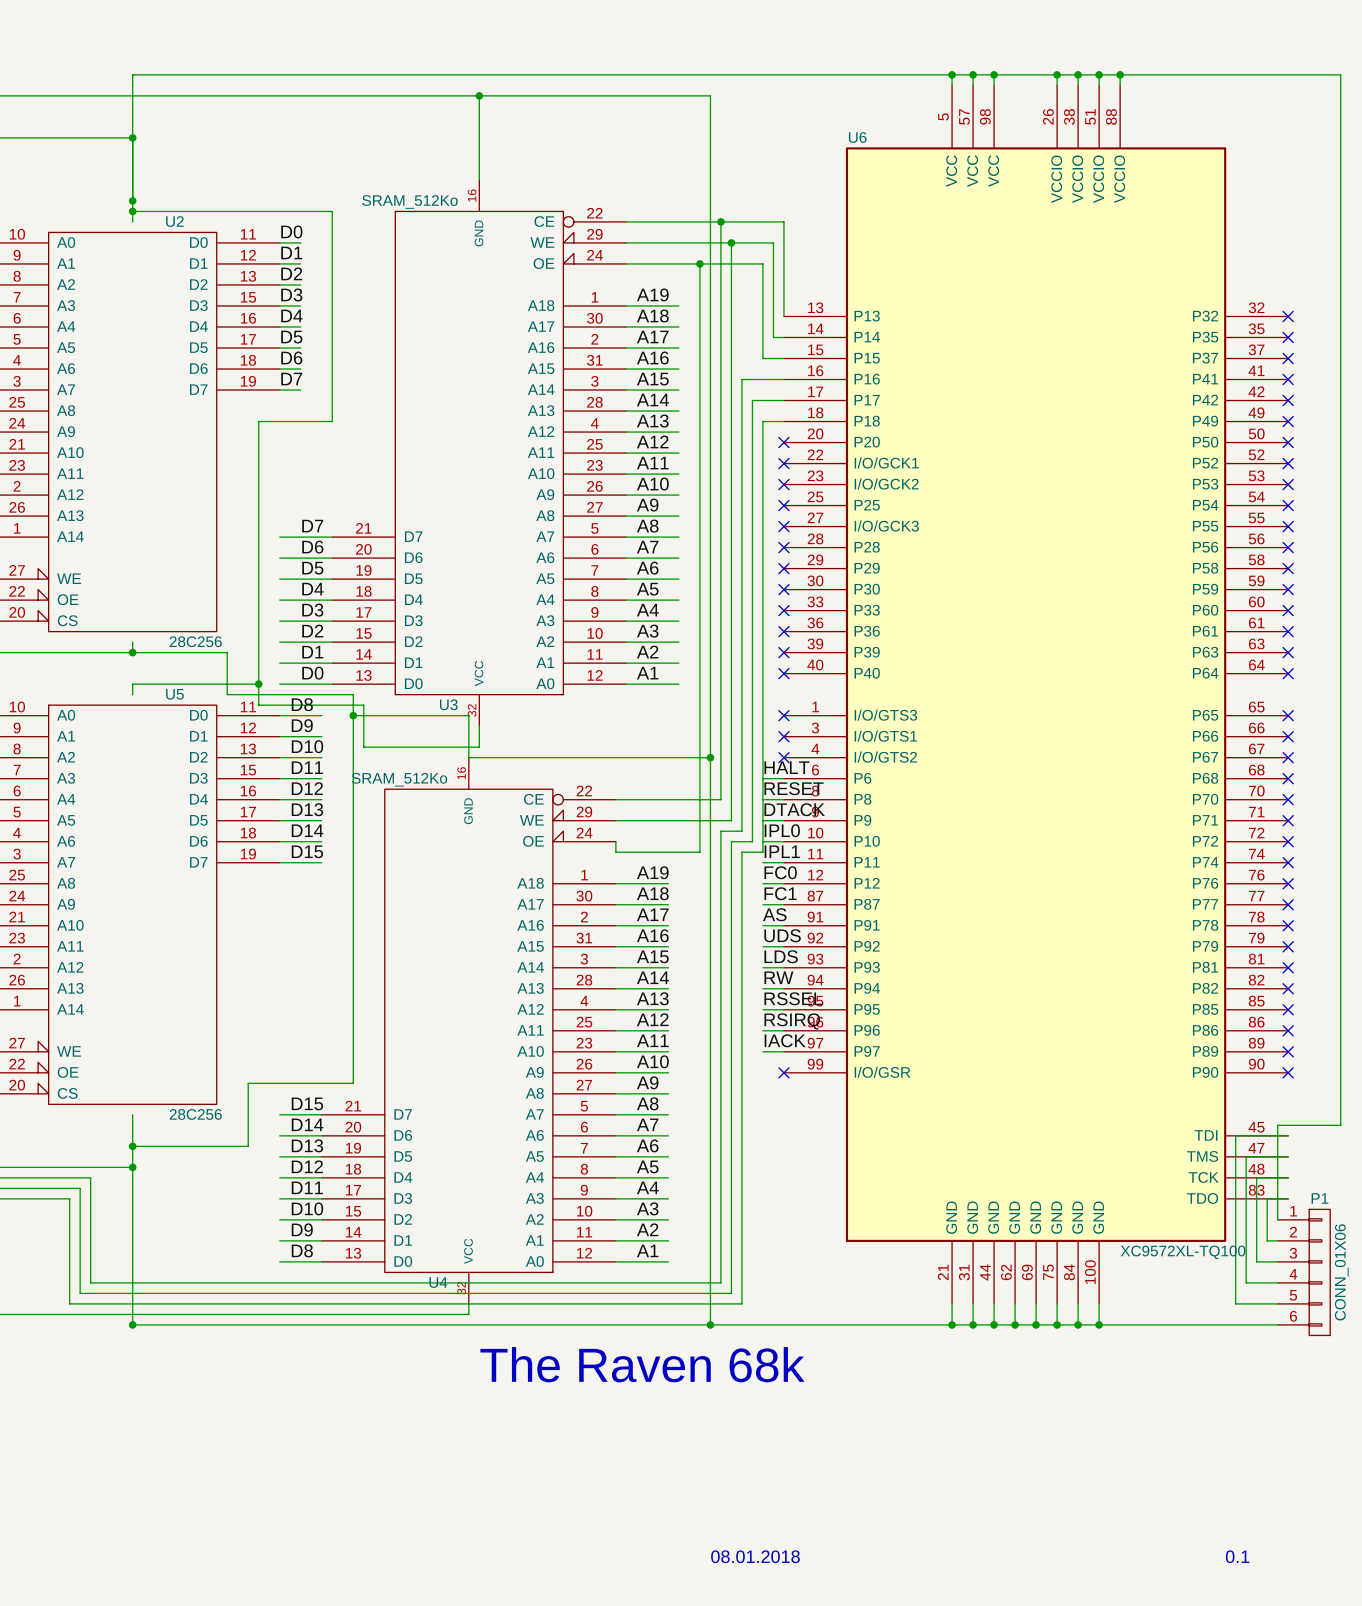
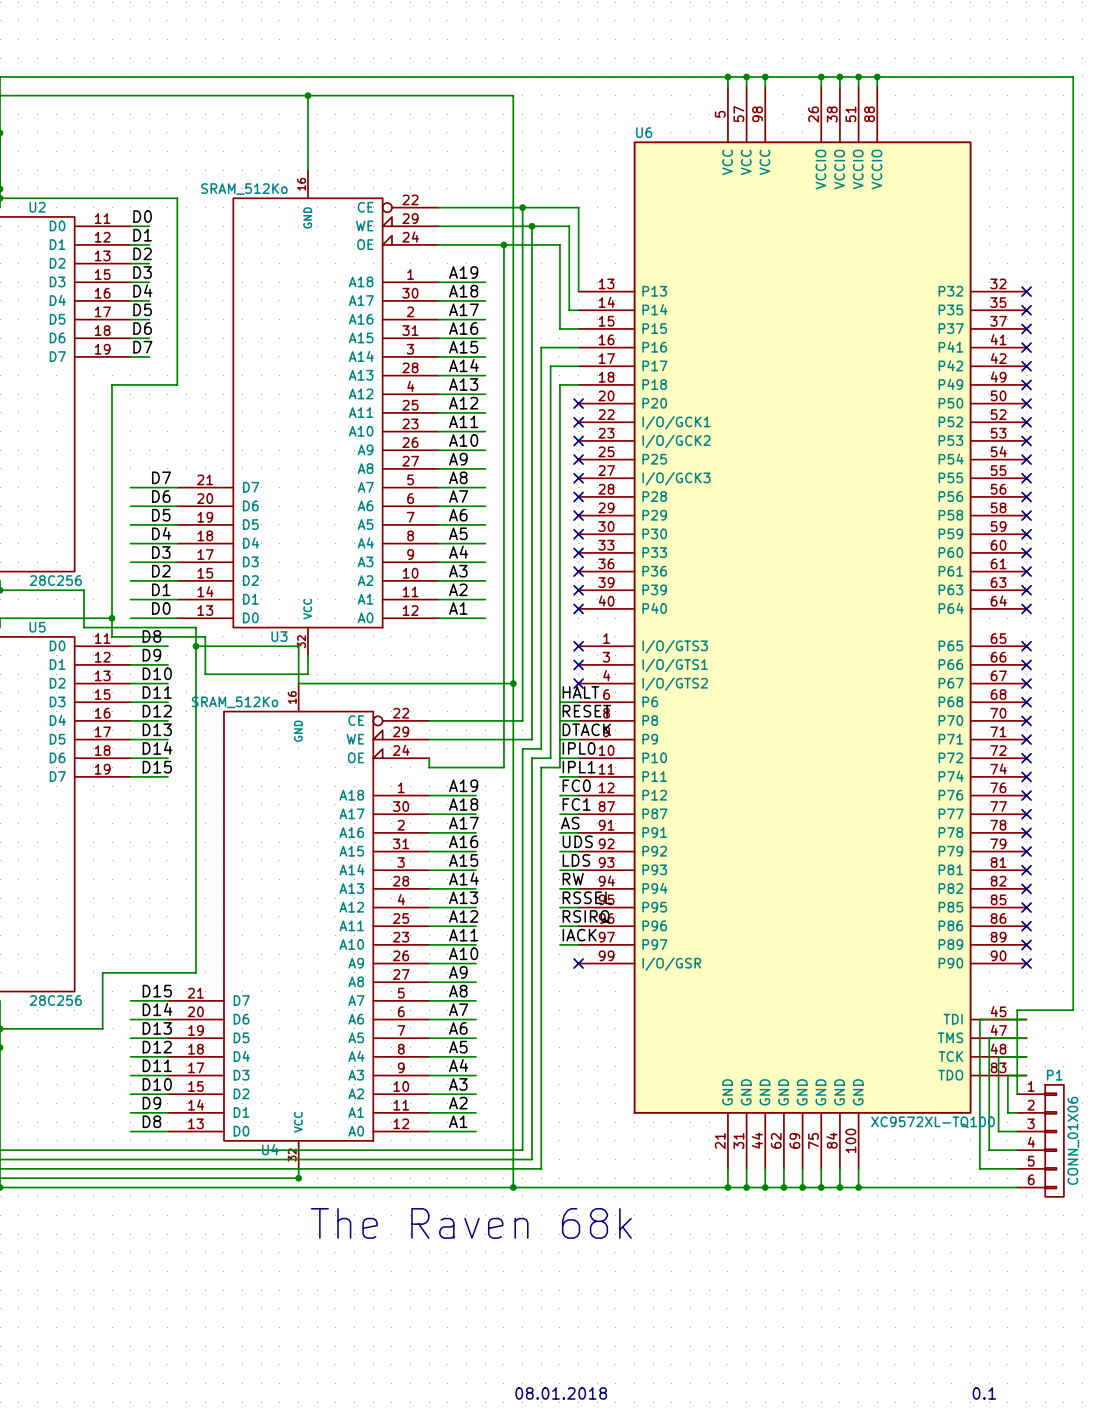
junction: none -> (298, 1178)

